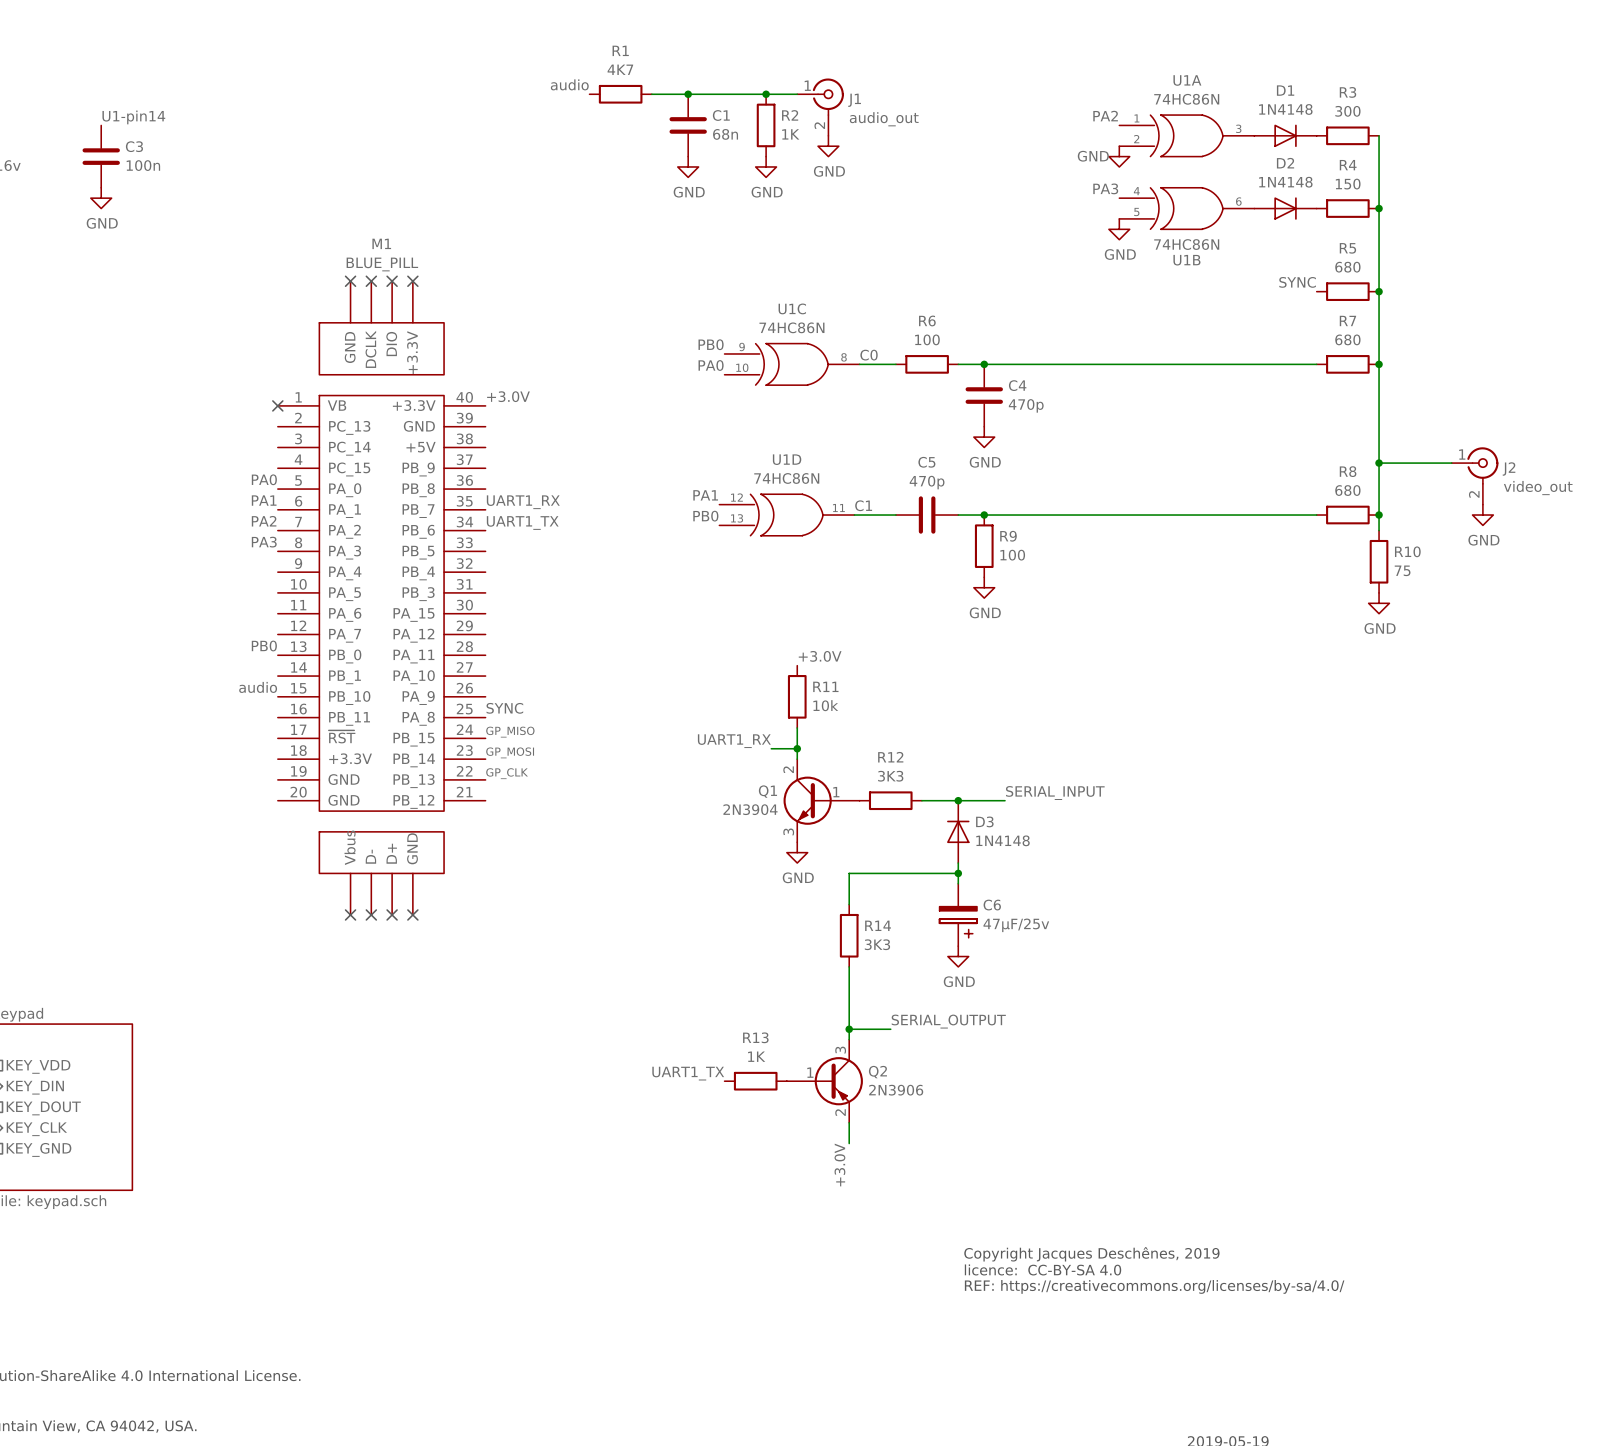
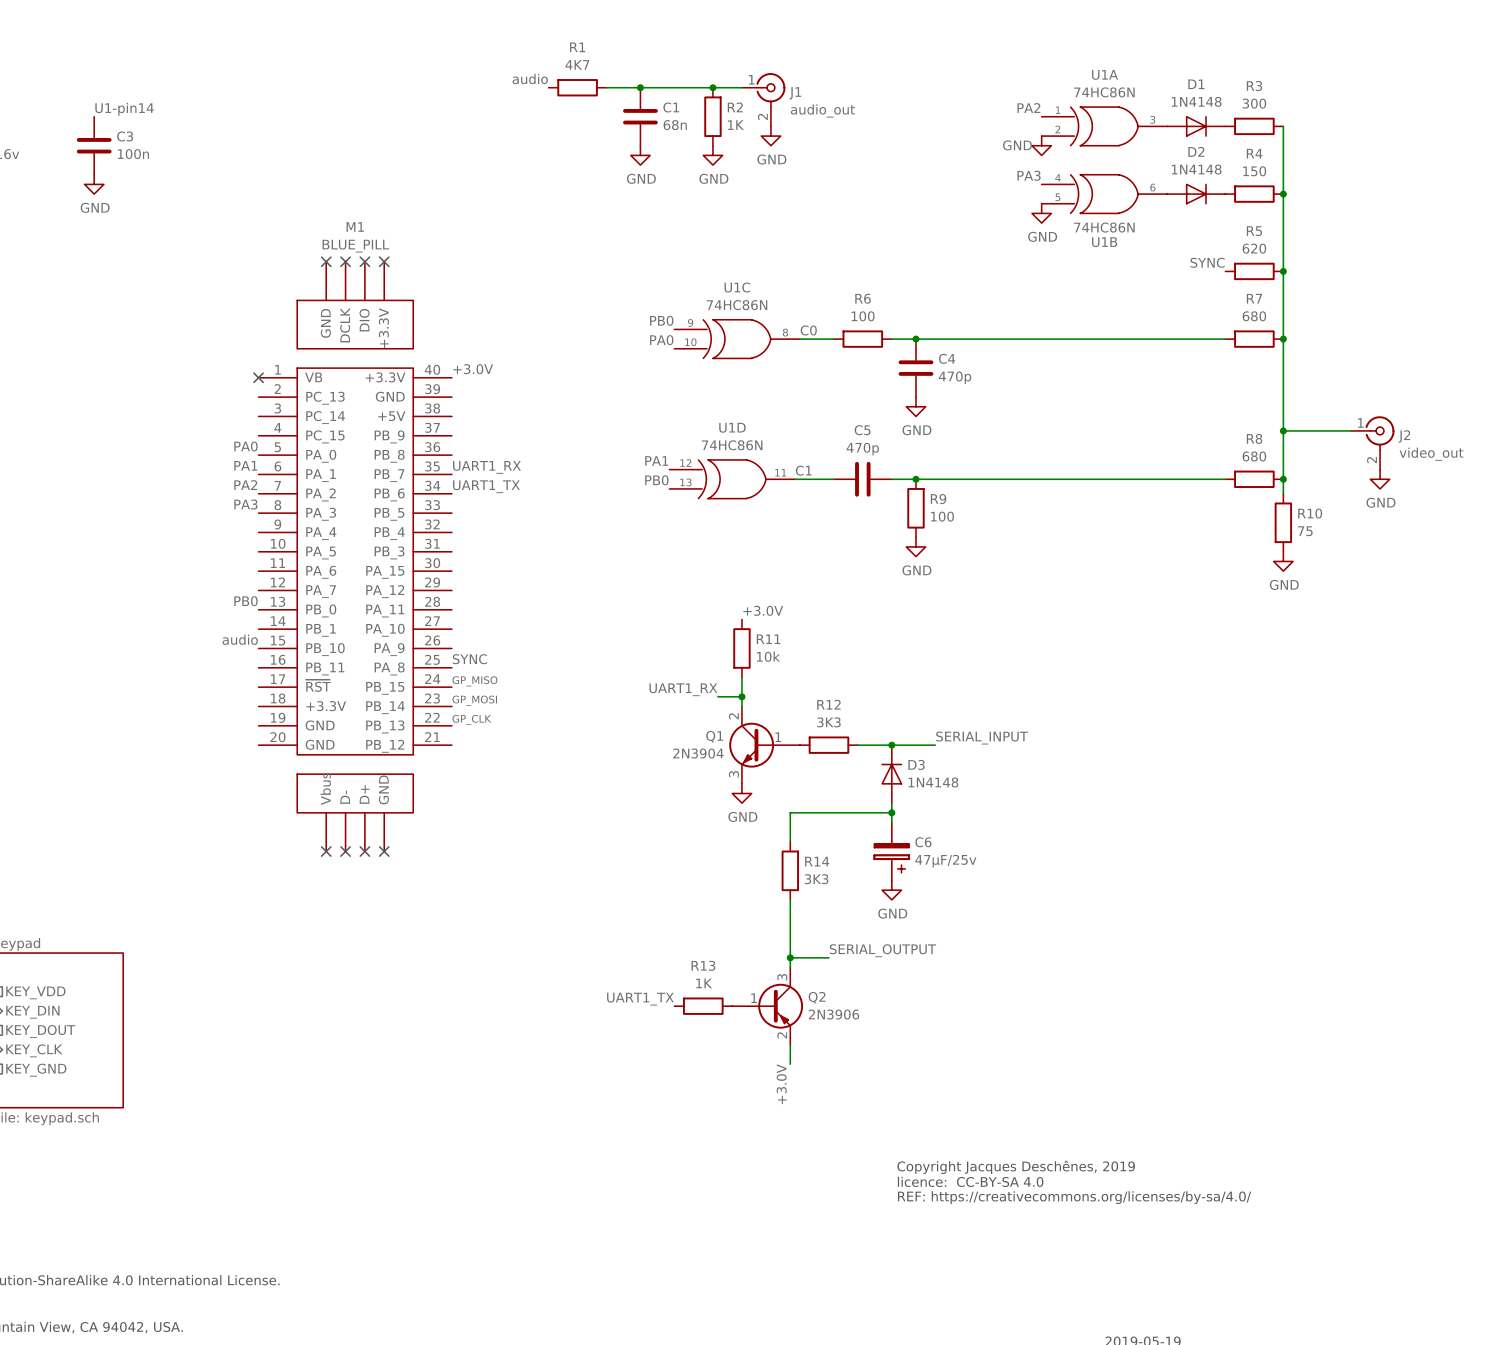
R5 value: 680 (1347, 267) -> 620 (1254, 248)

